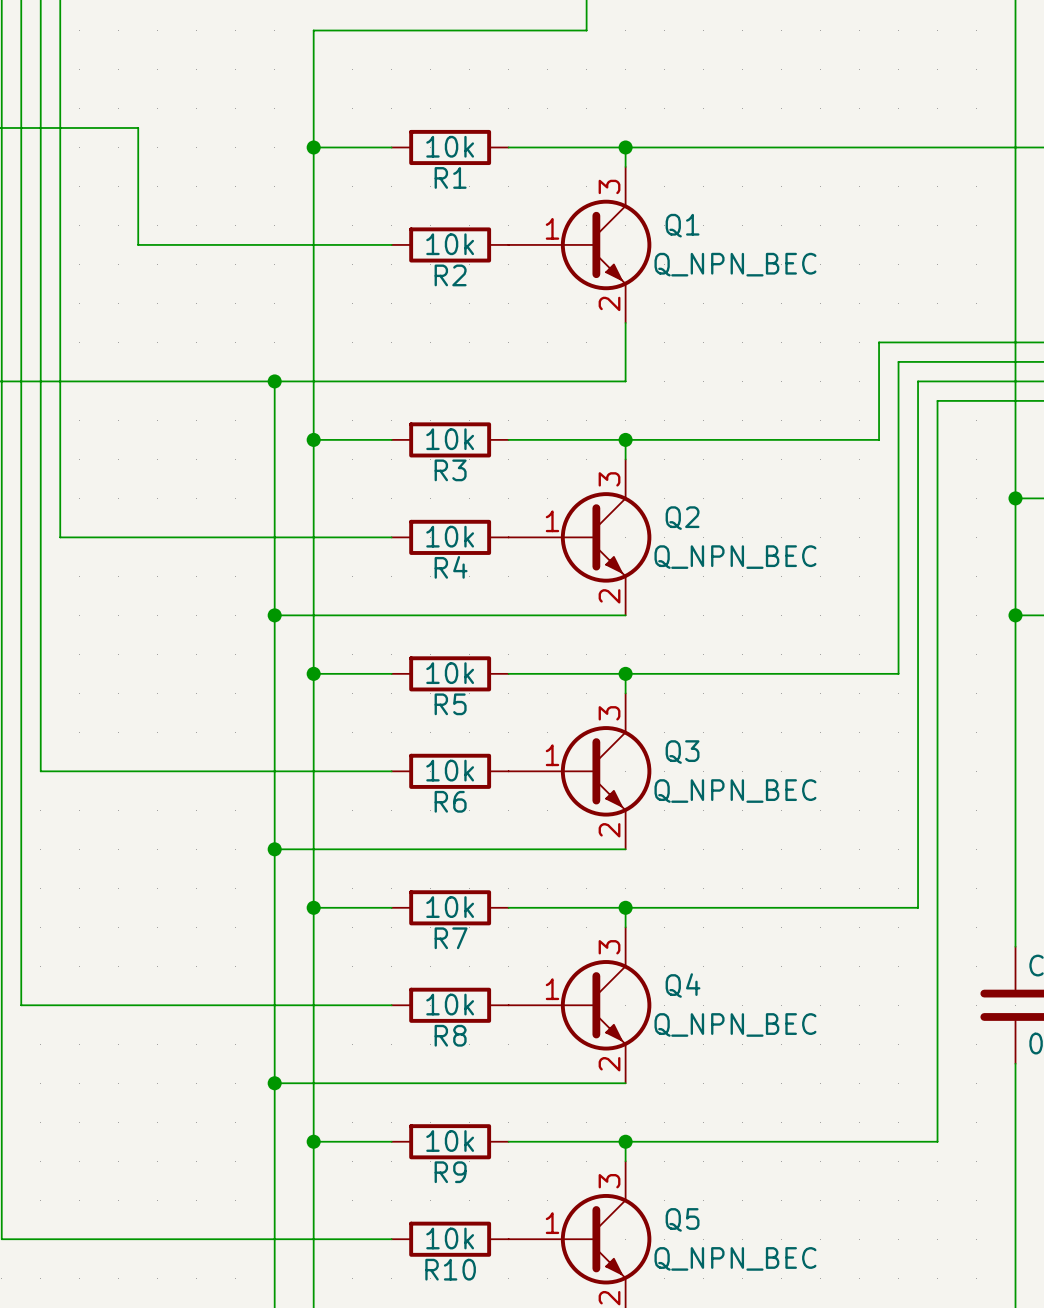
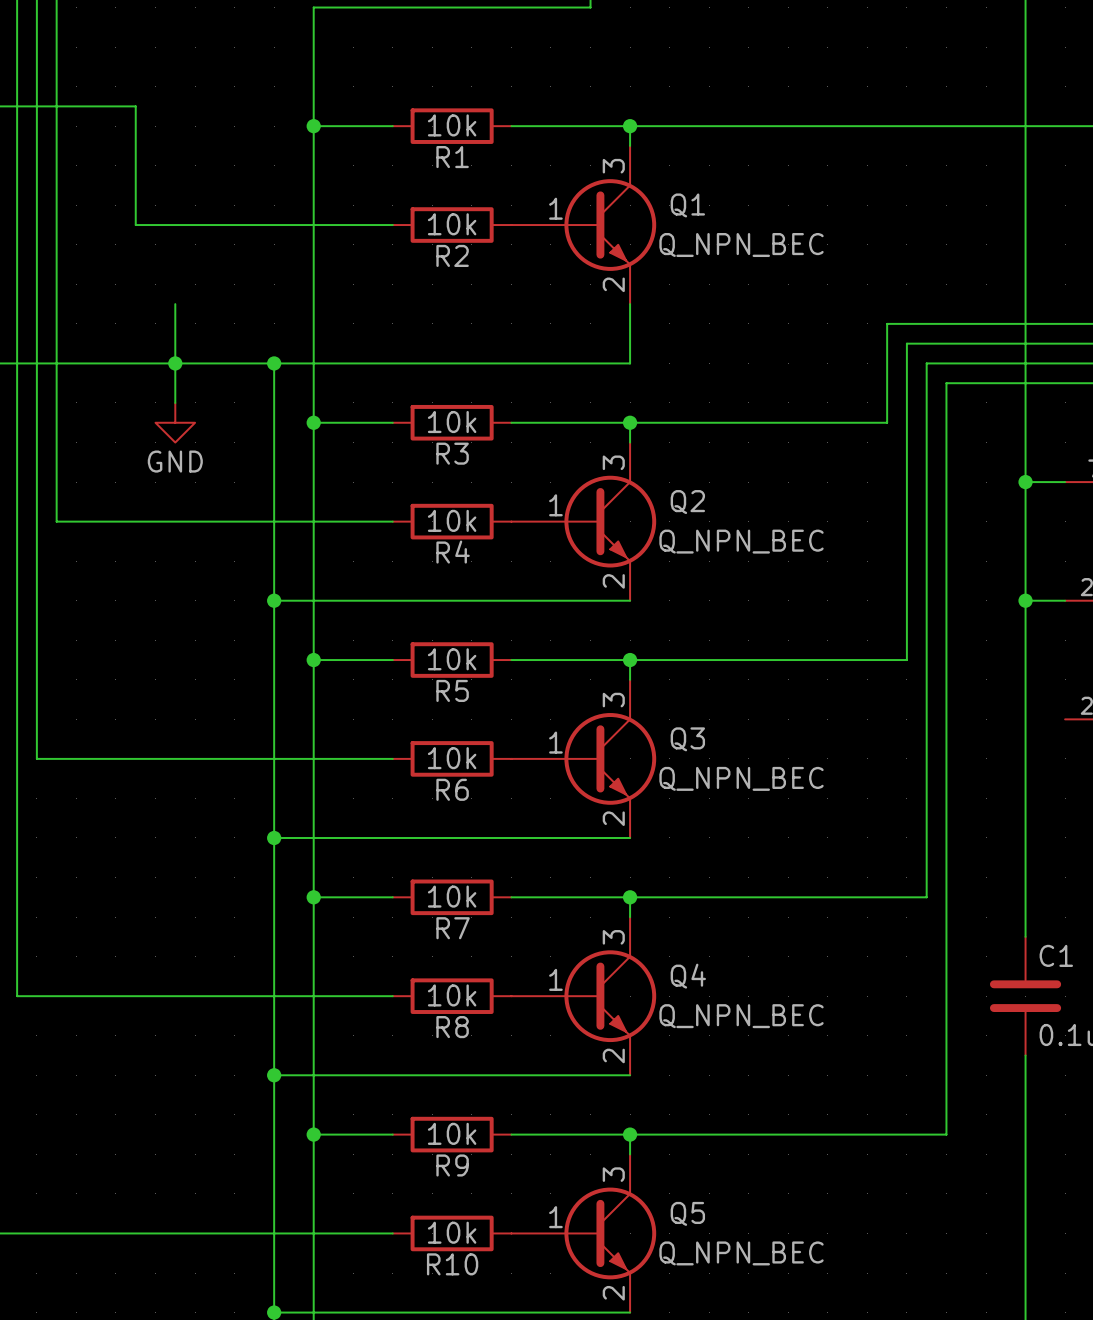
wire: none -> (175, 304) (175, 402)
junction: none -> (175, 363)
power symbol: none -> GND (175, 422)

